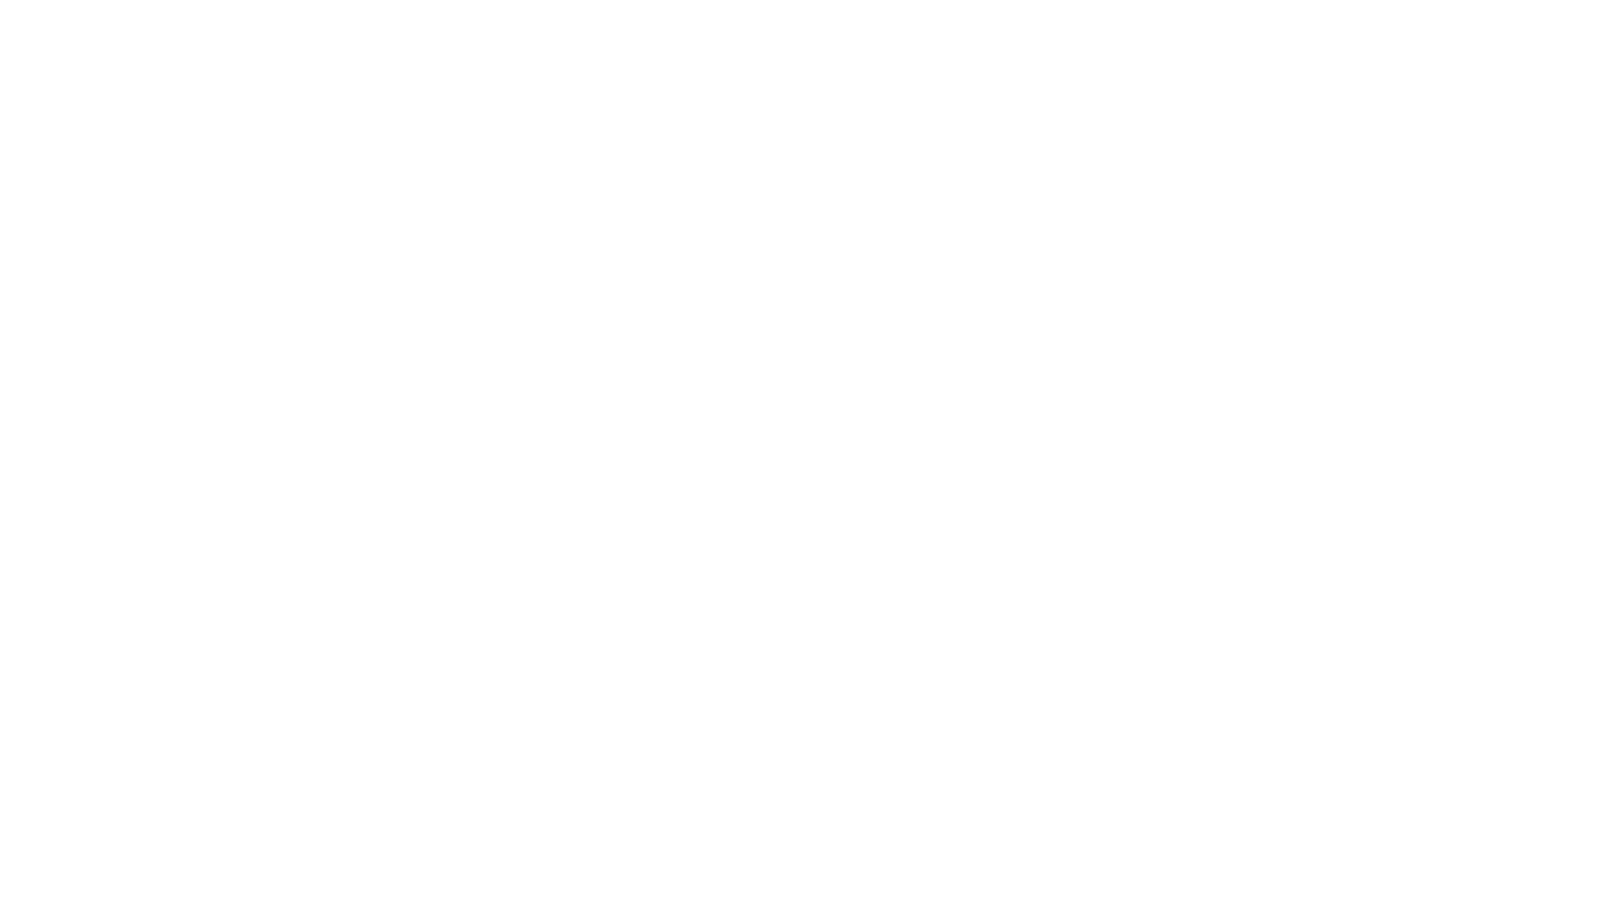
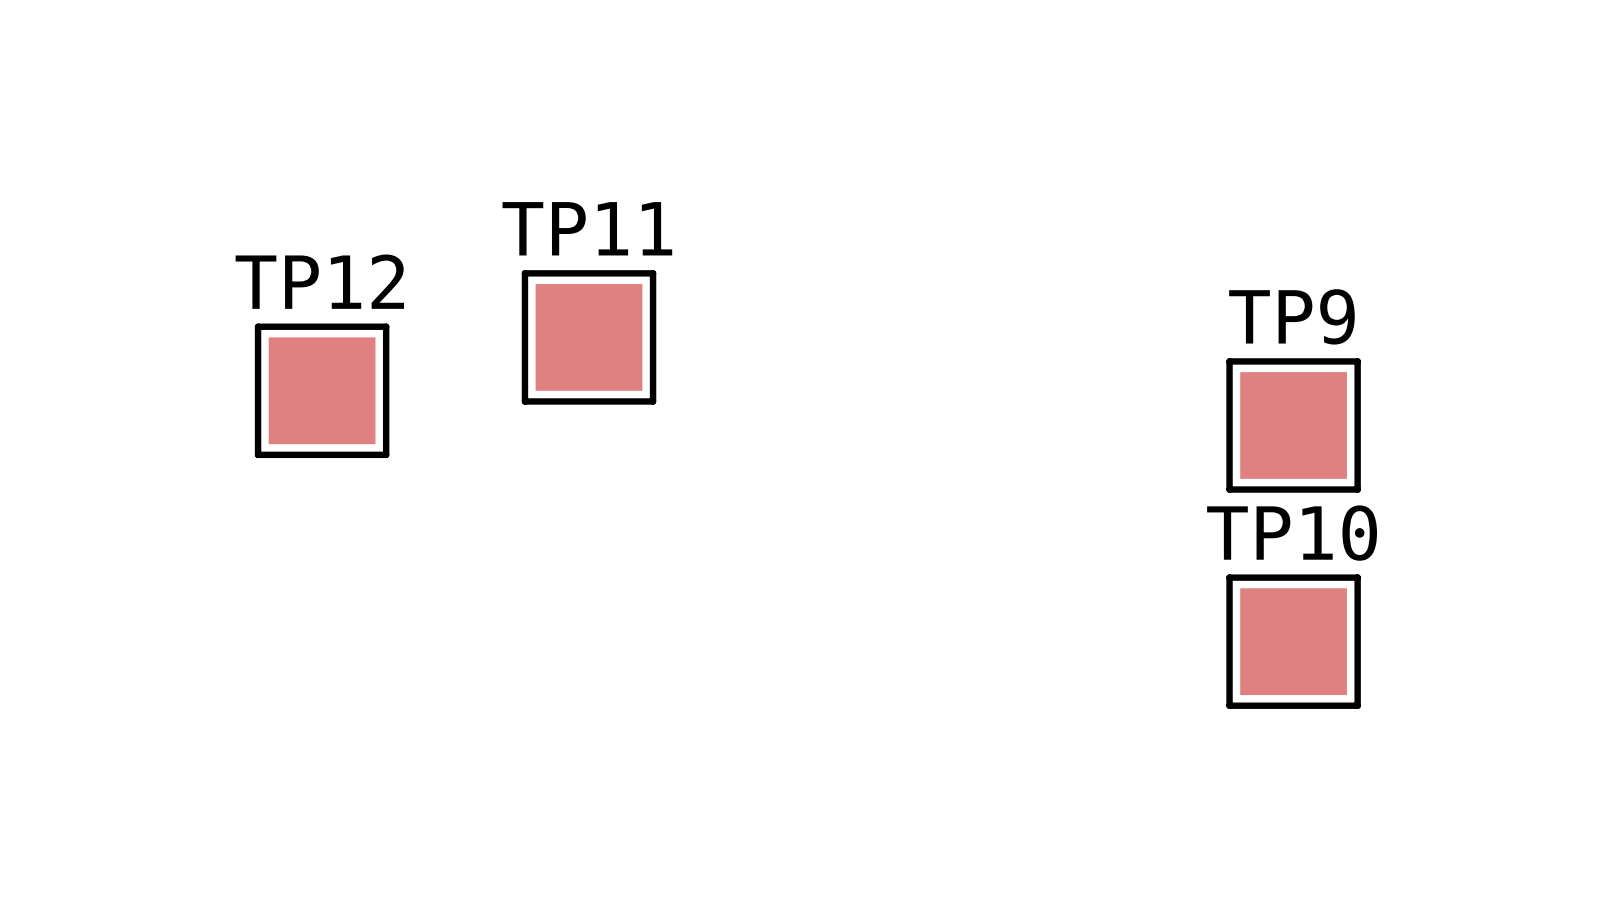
TP11: none -> (589, 337)
TP12: none -> (322, 390)
TP9: none -> (1293, 425)
TP10: none -> (1293, 641)

